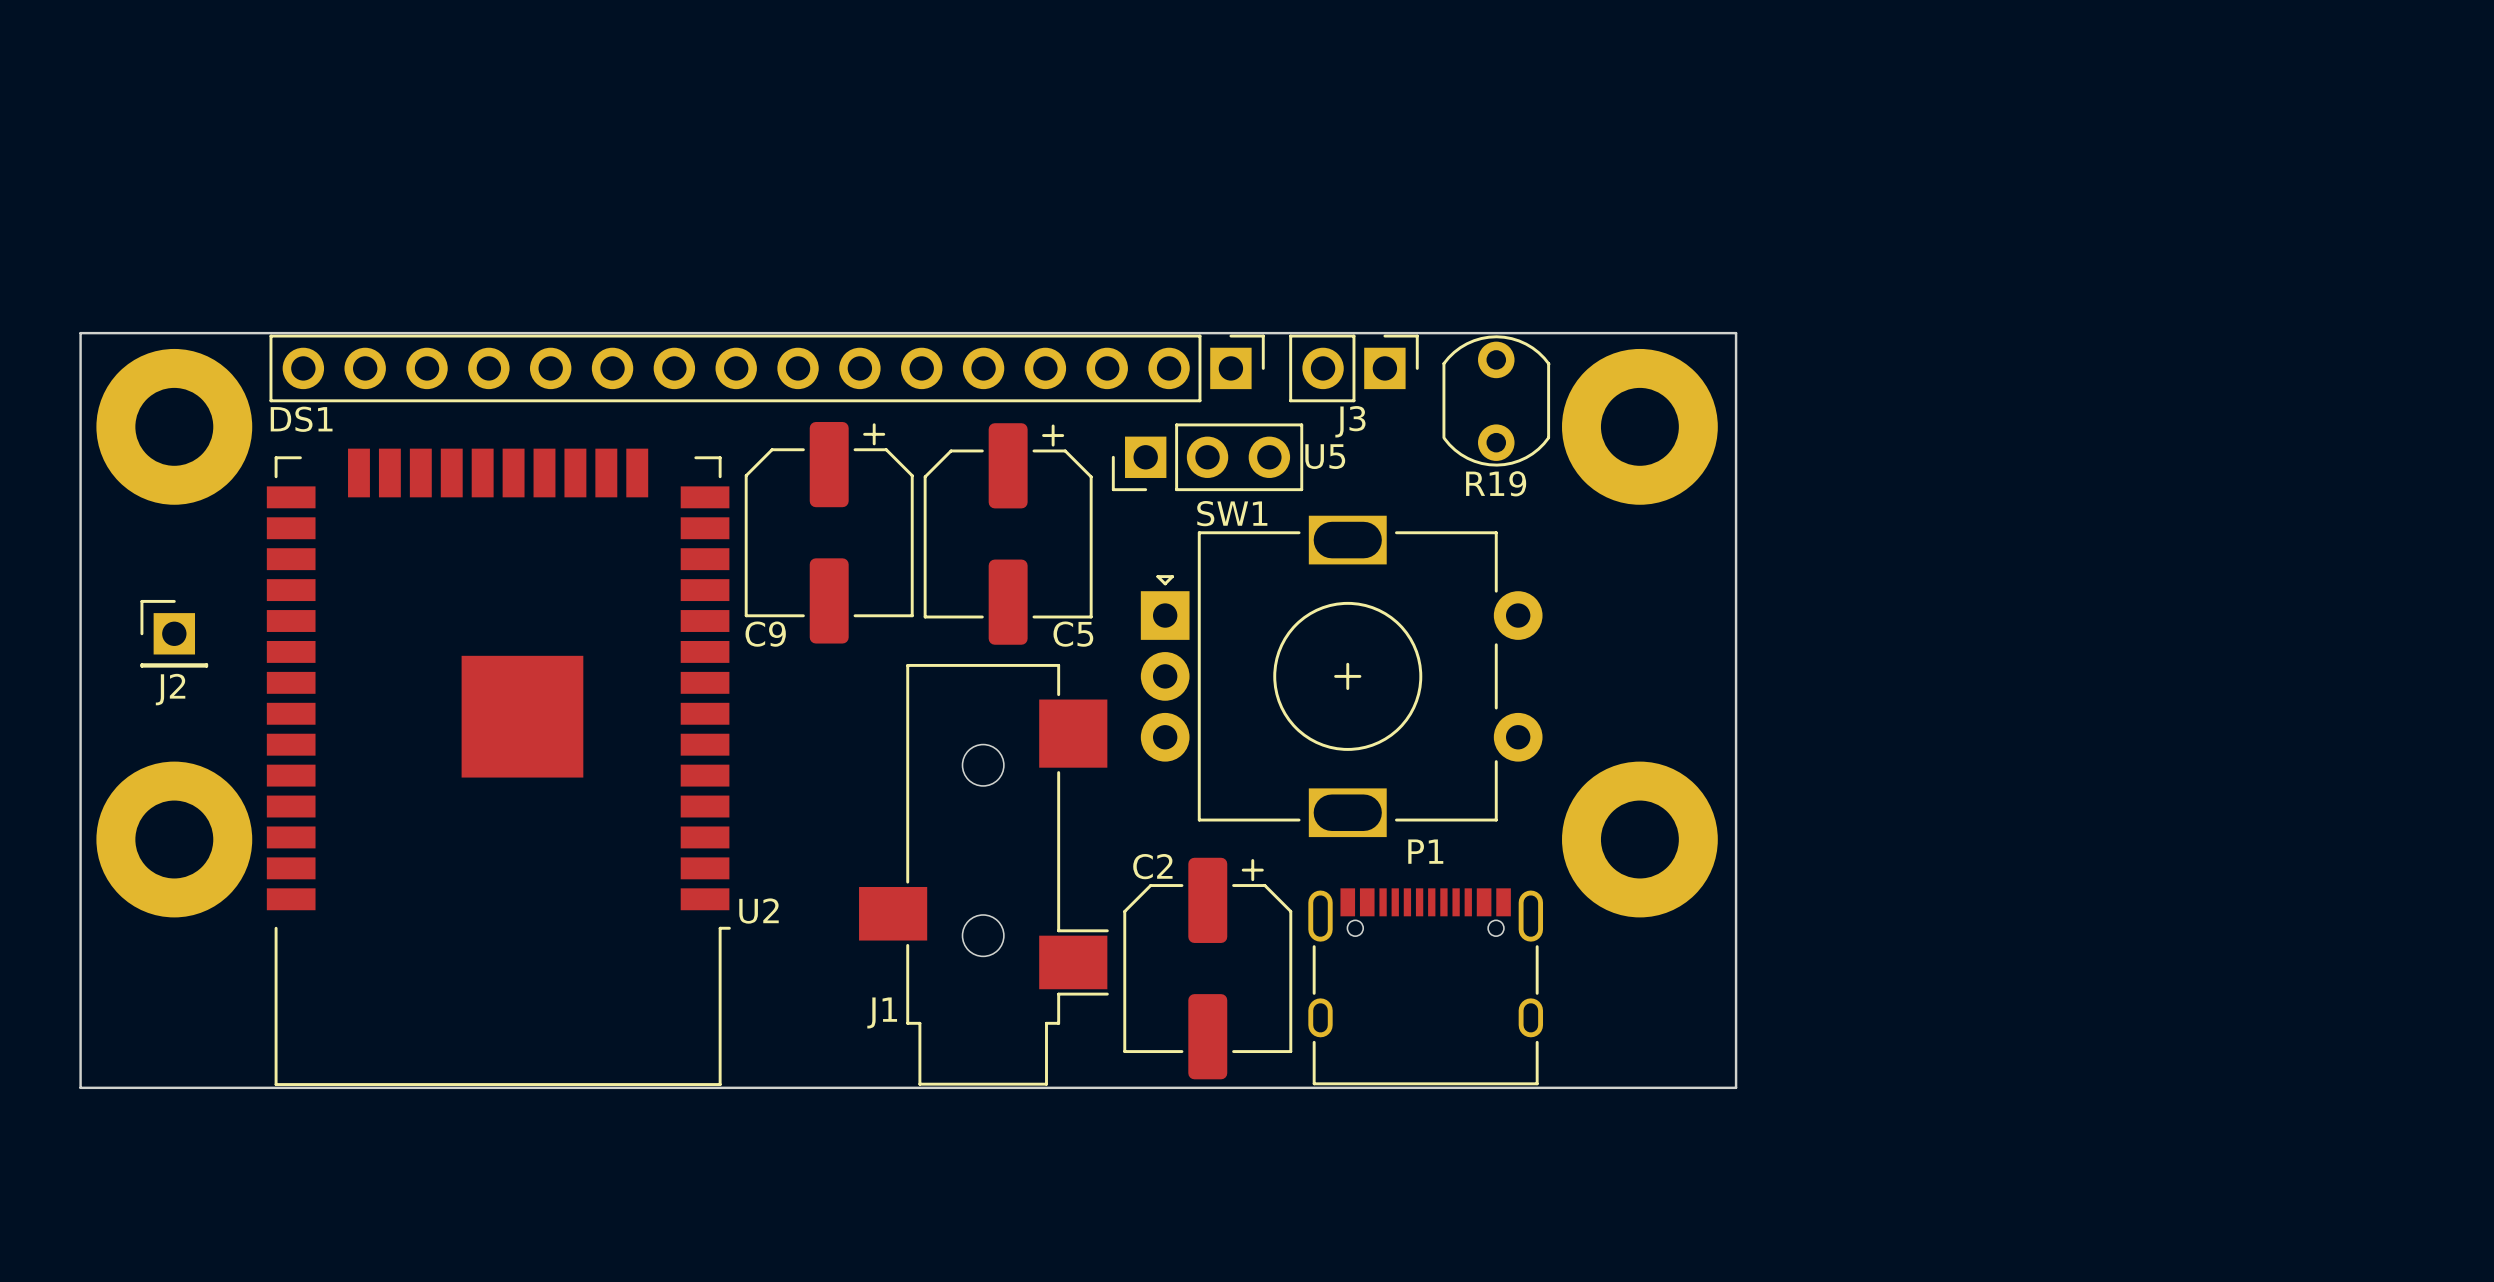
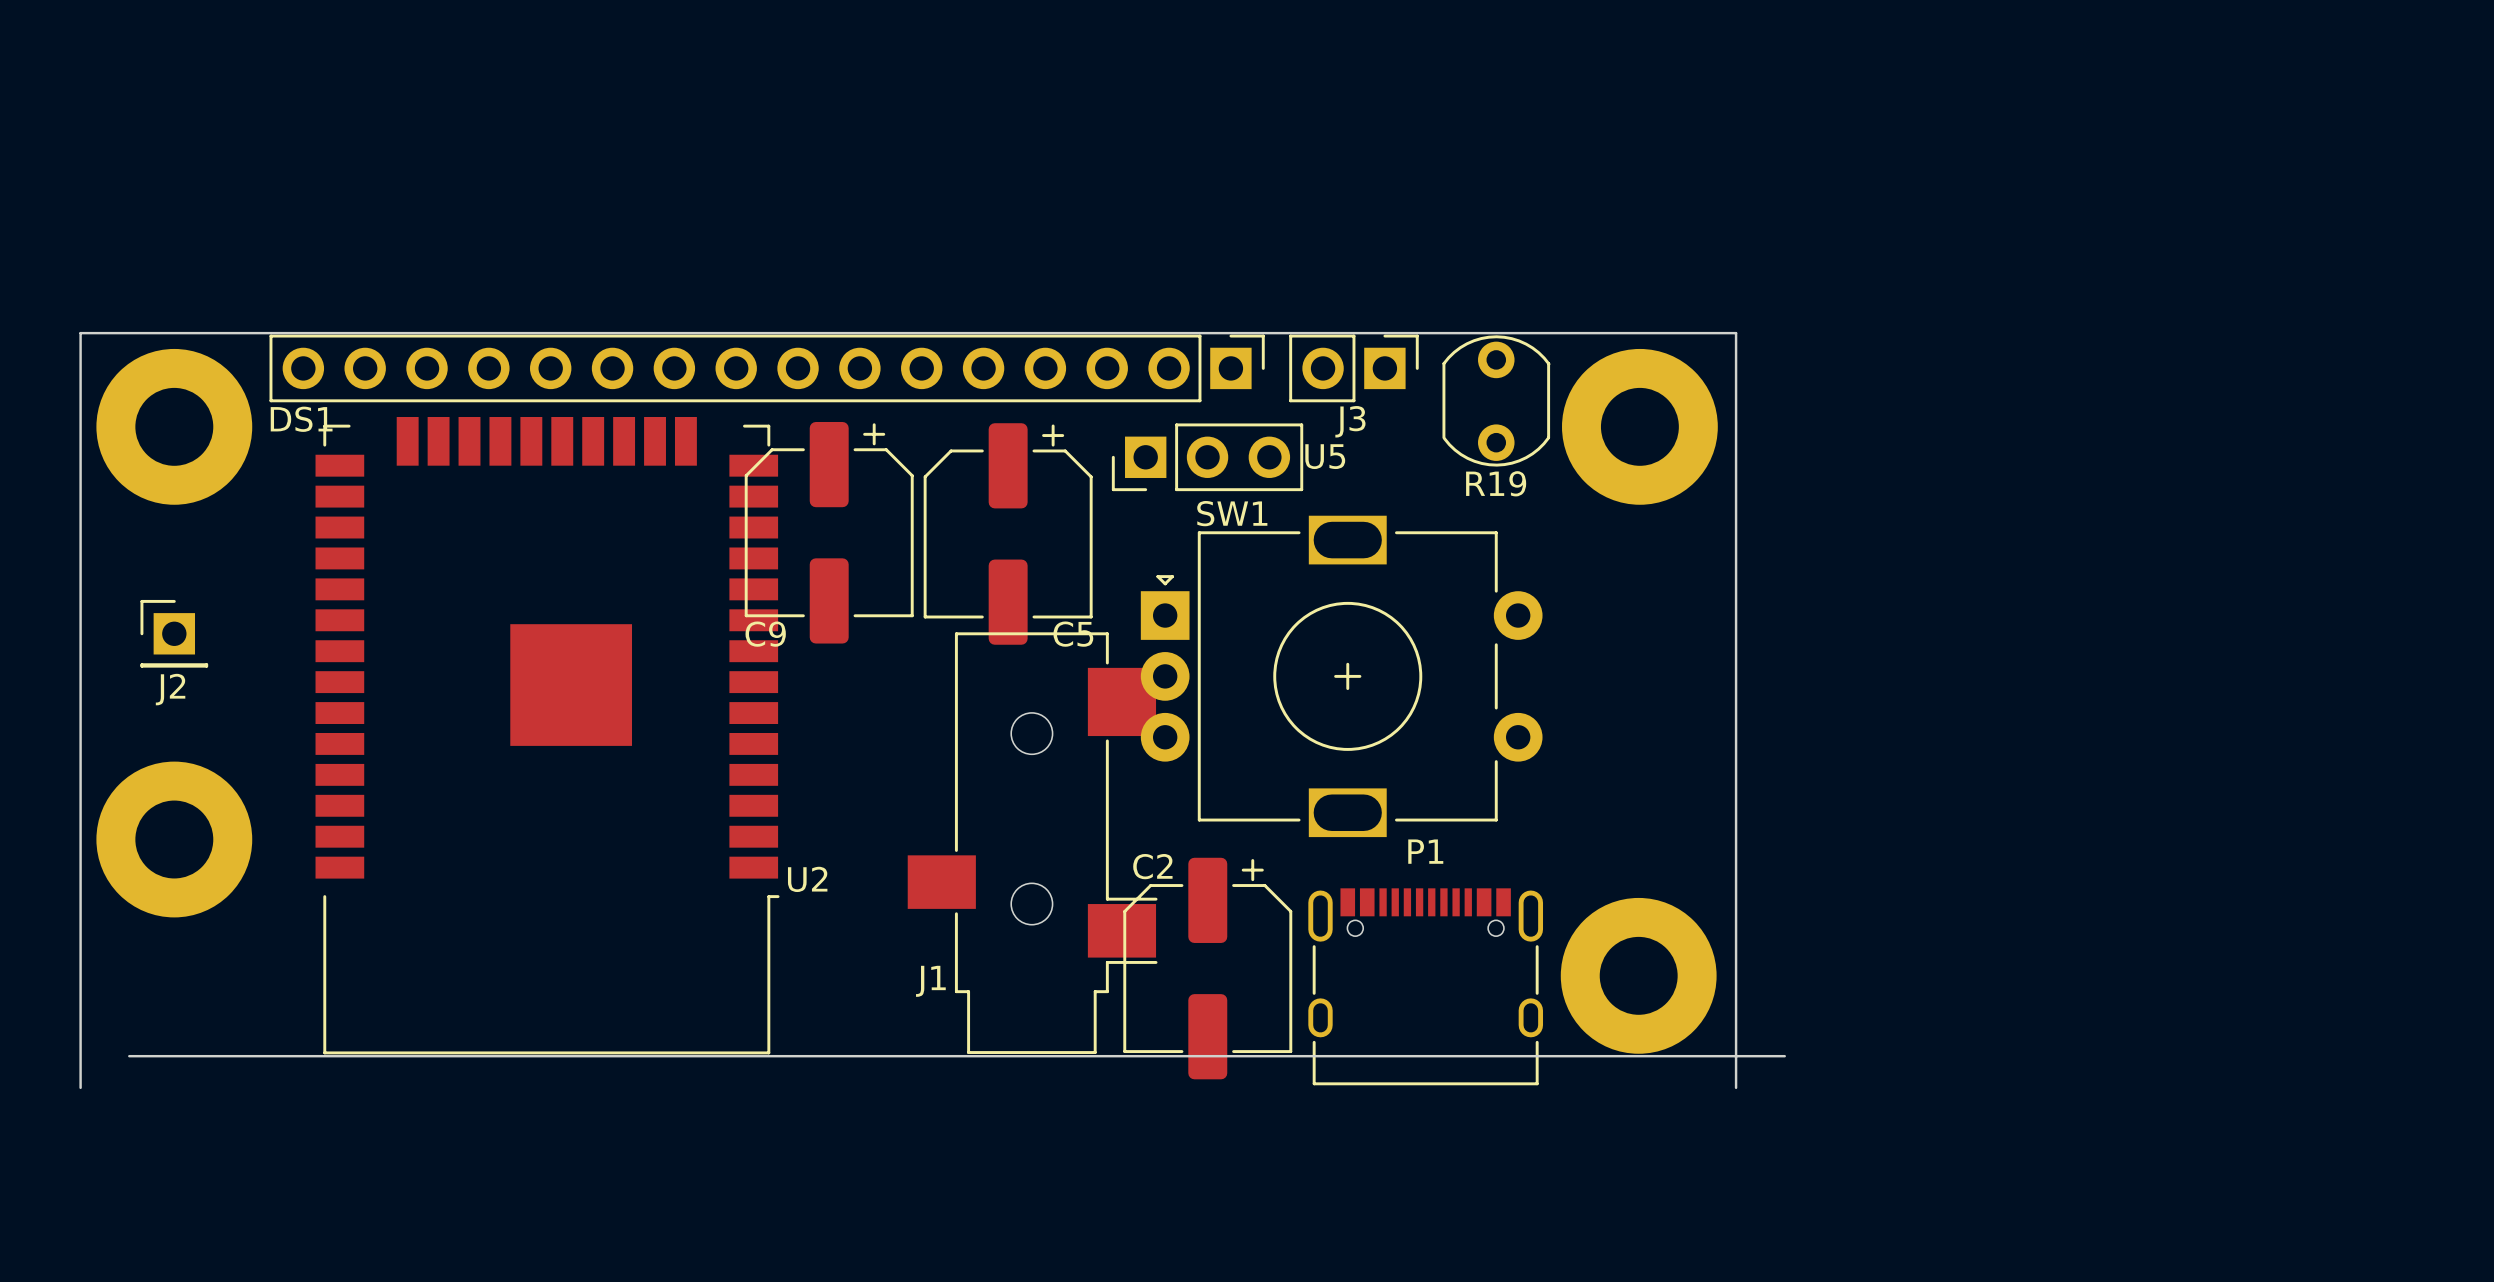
U2 position: (498, 767) -> (547, 735)
part position: (1639, 839) -> (1638, 975)
J1 position: (983, 874) -> (1032, 843)
board edge: (80, 1087) (1736, 1087) -> (129, 1056) (1784, 1056)

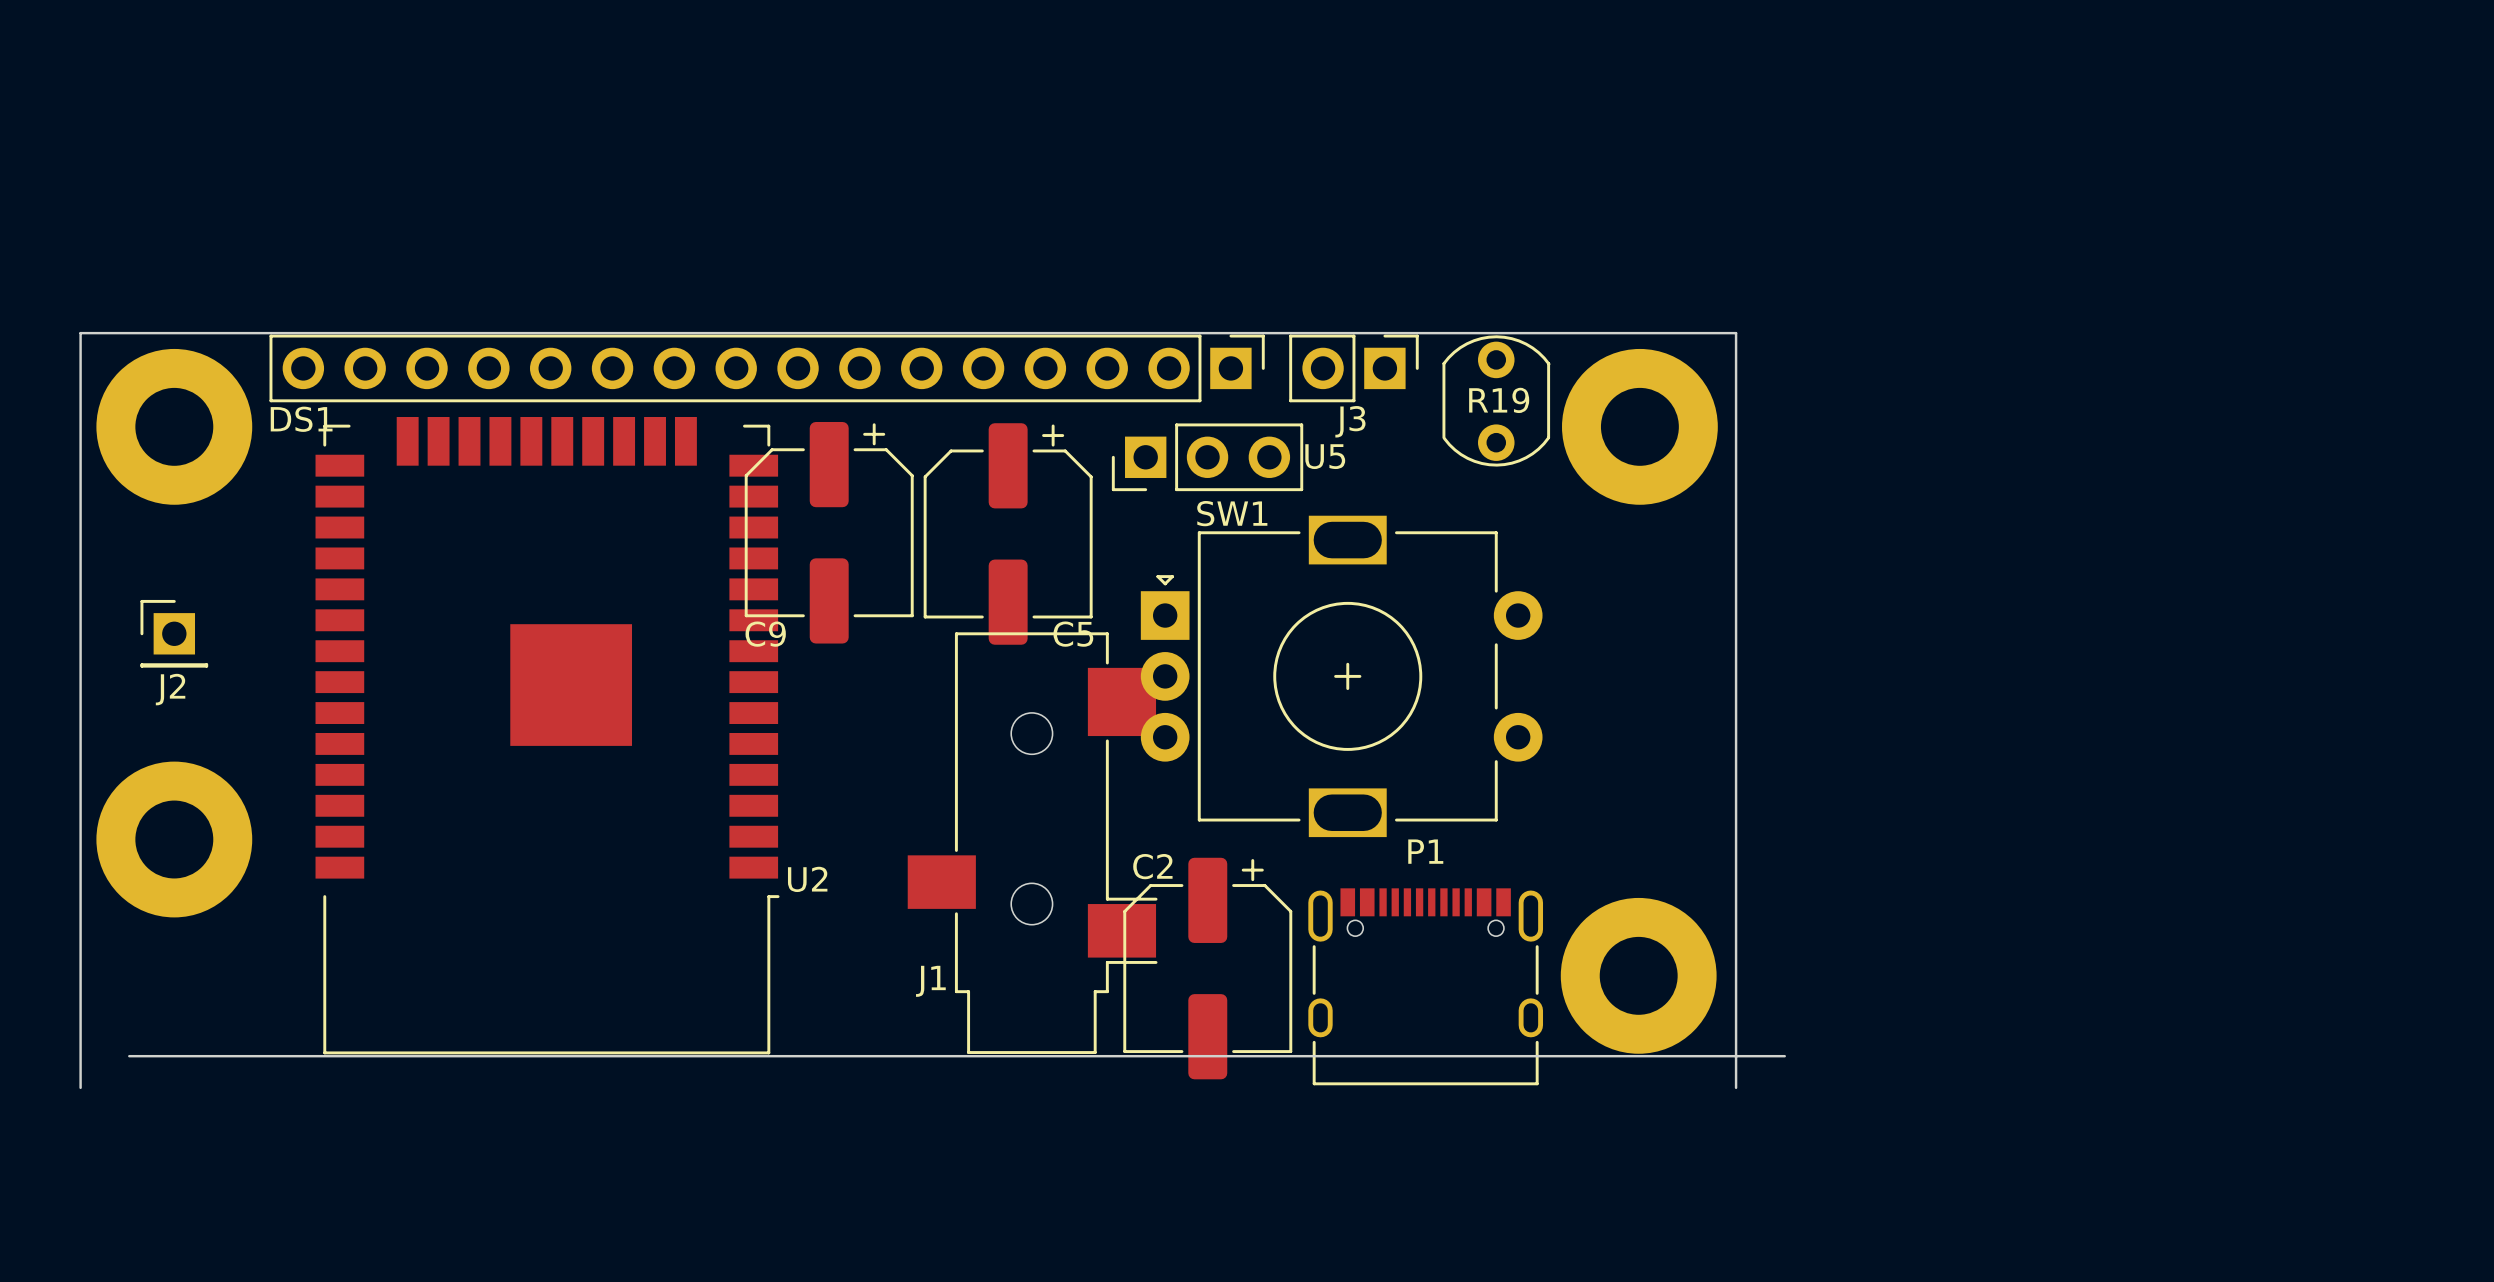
R19 name position: R19 (1496, 483) -> R19 (1499, 400)

